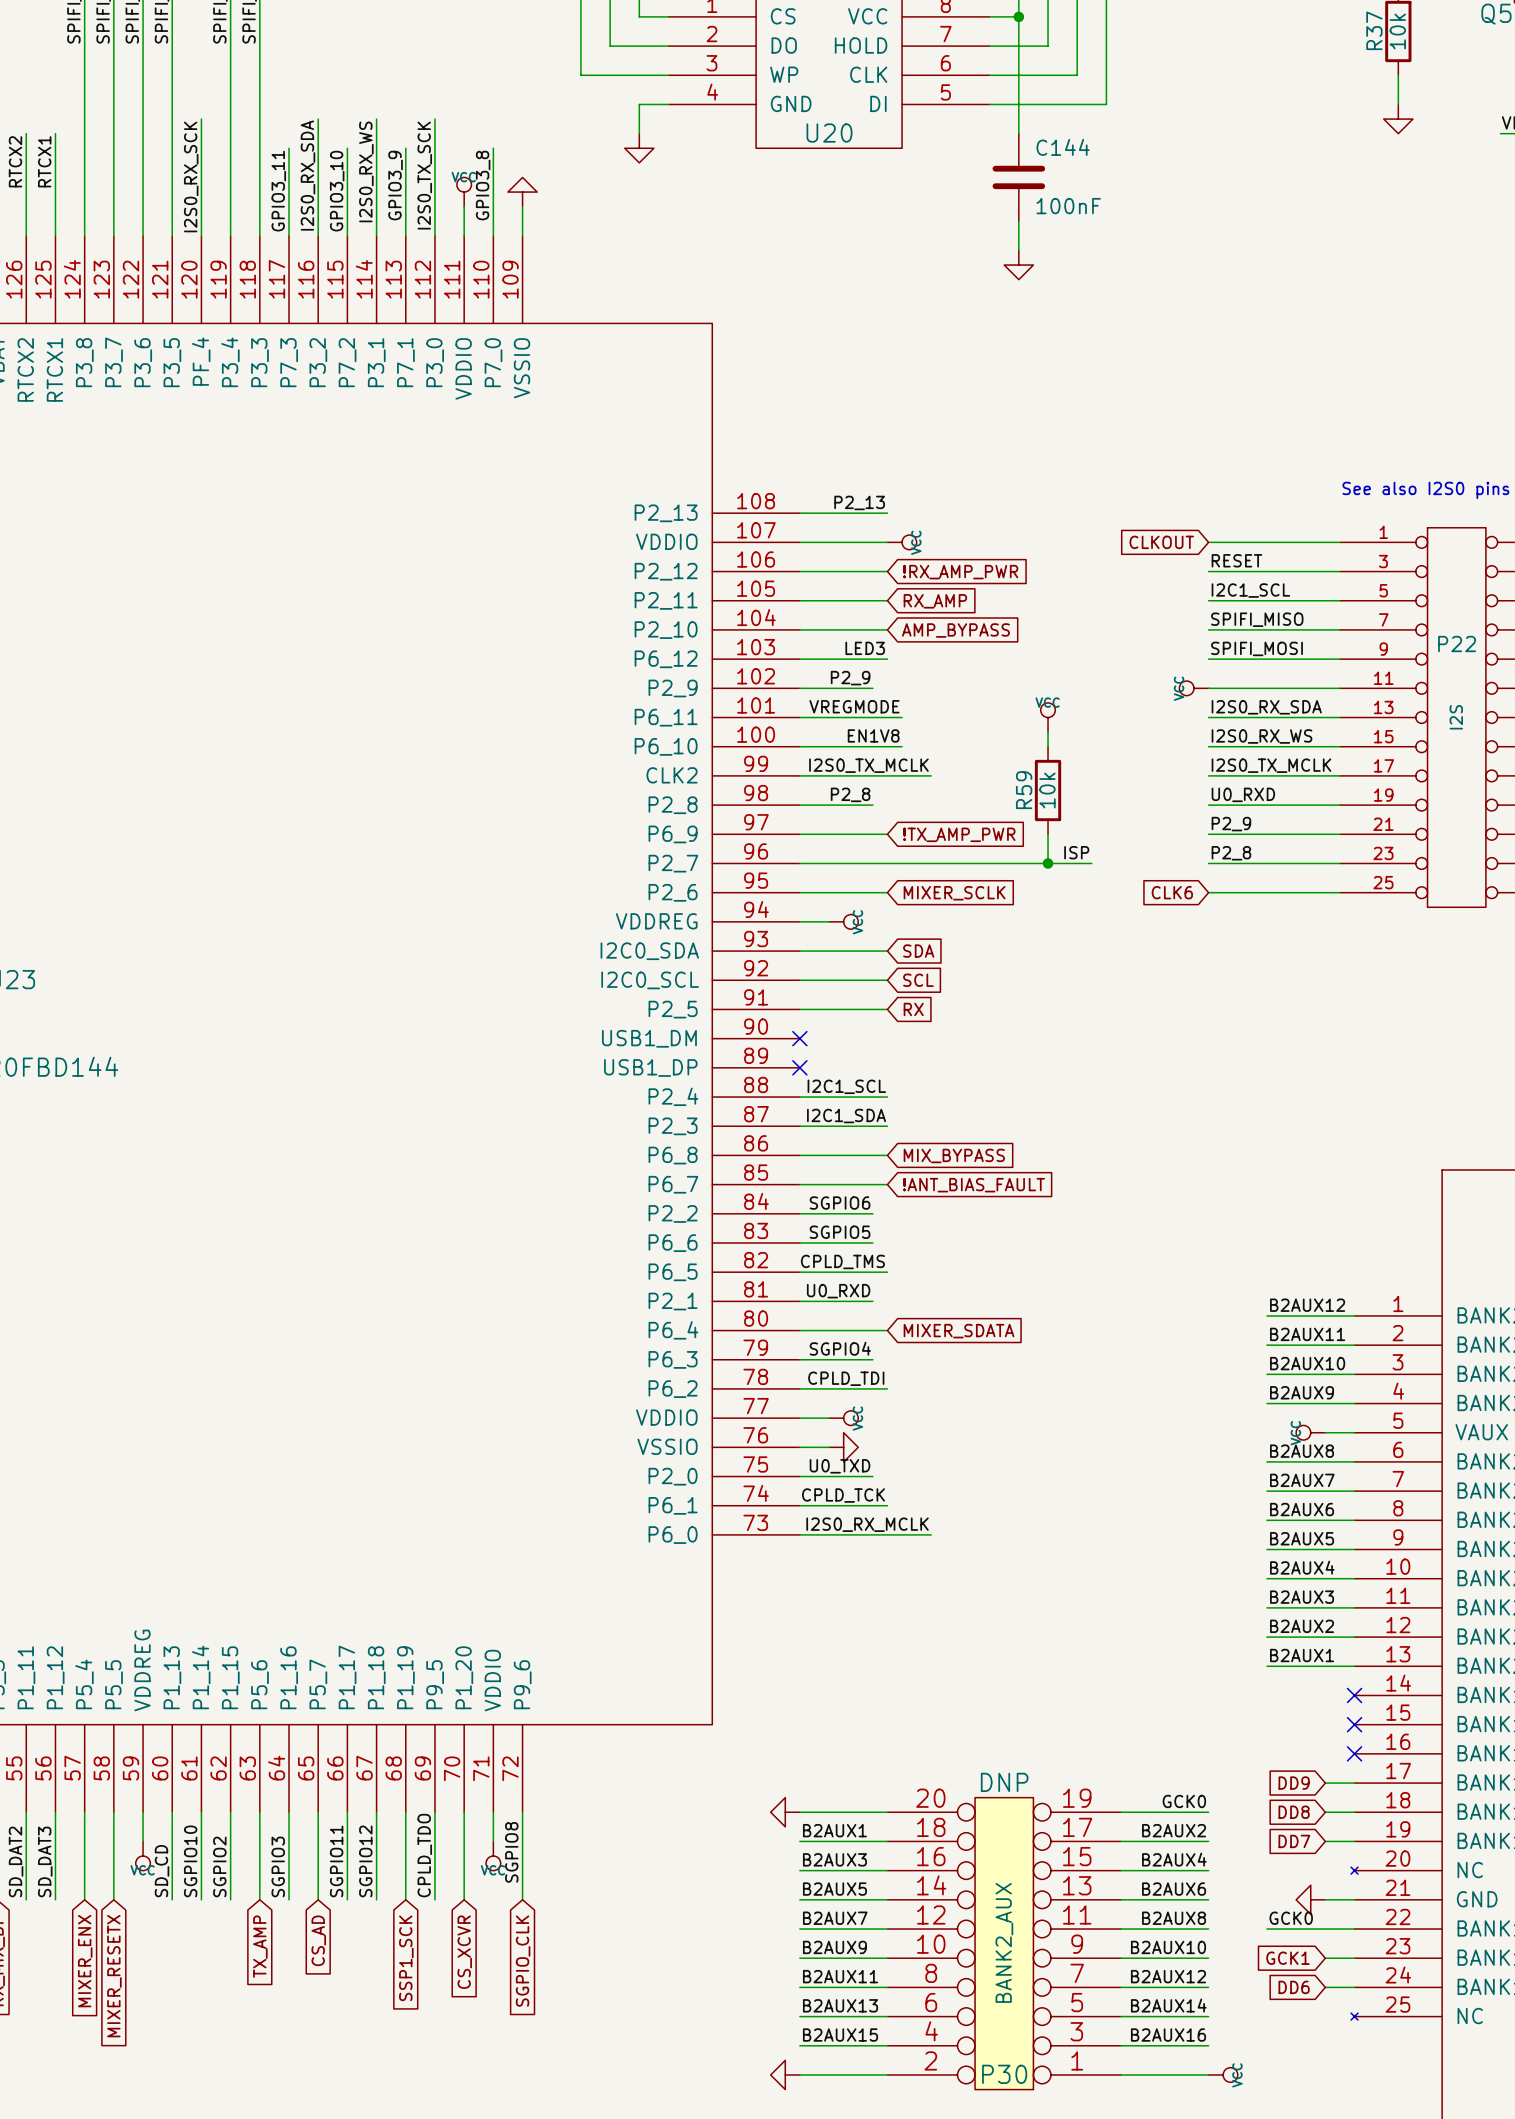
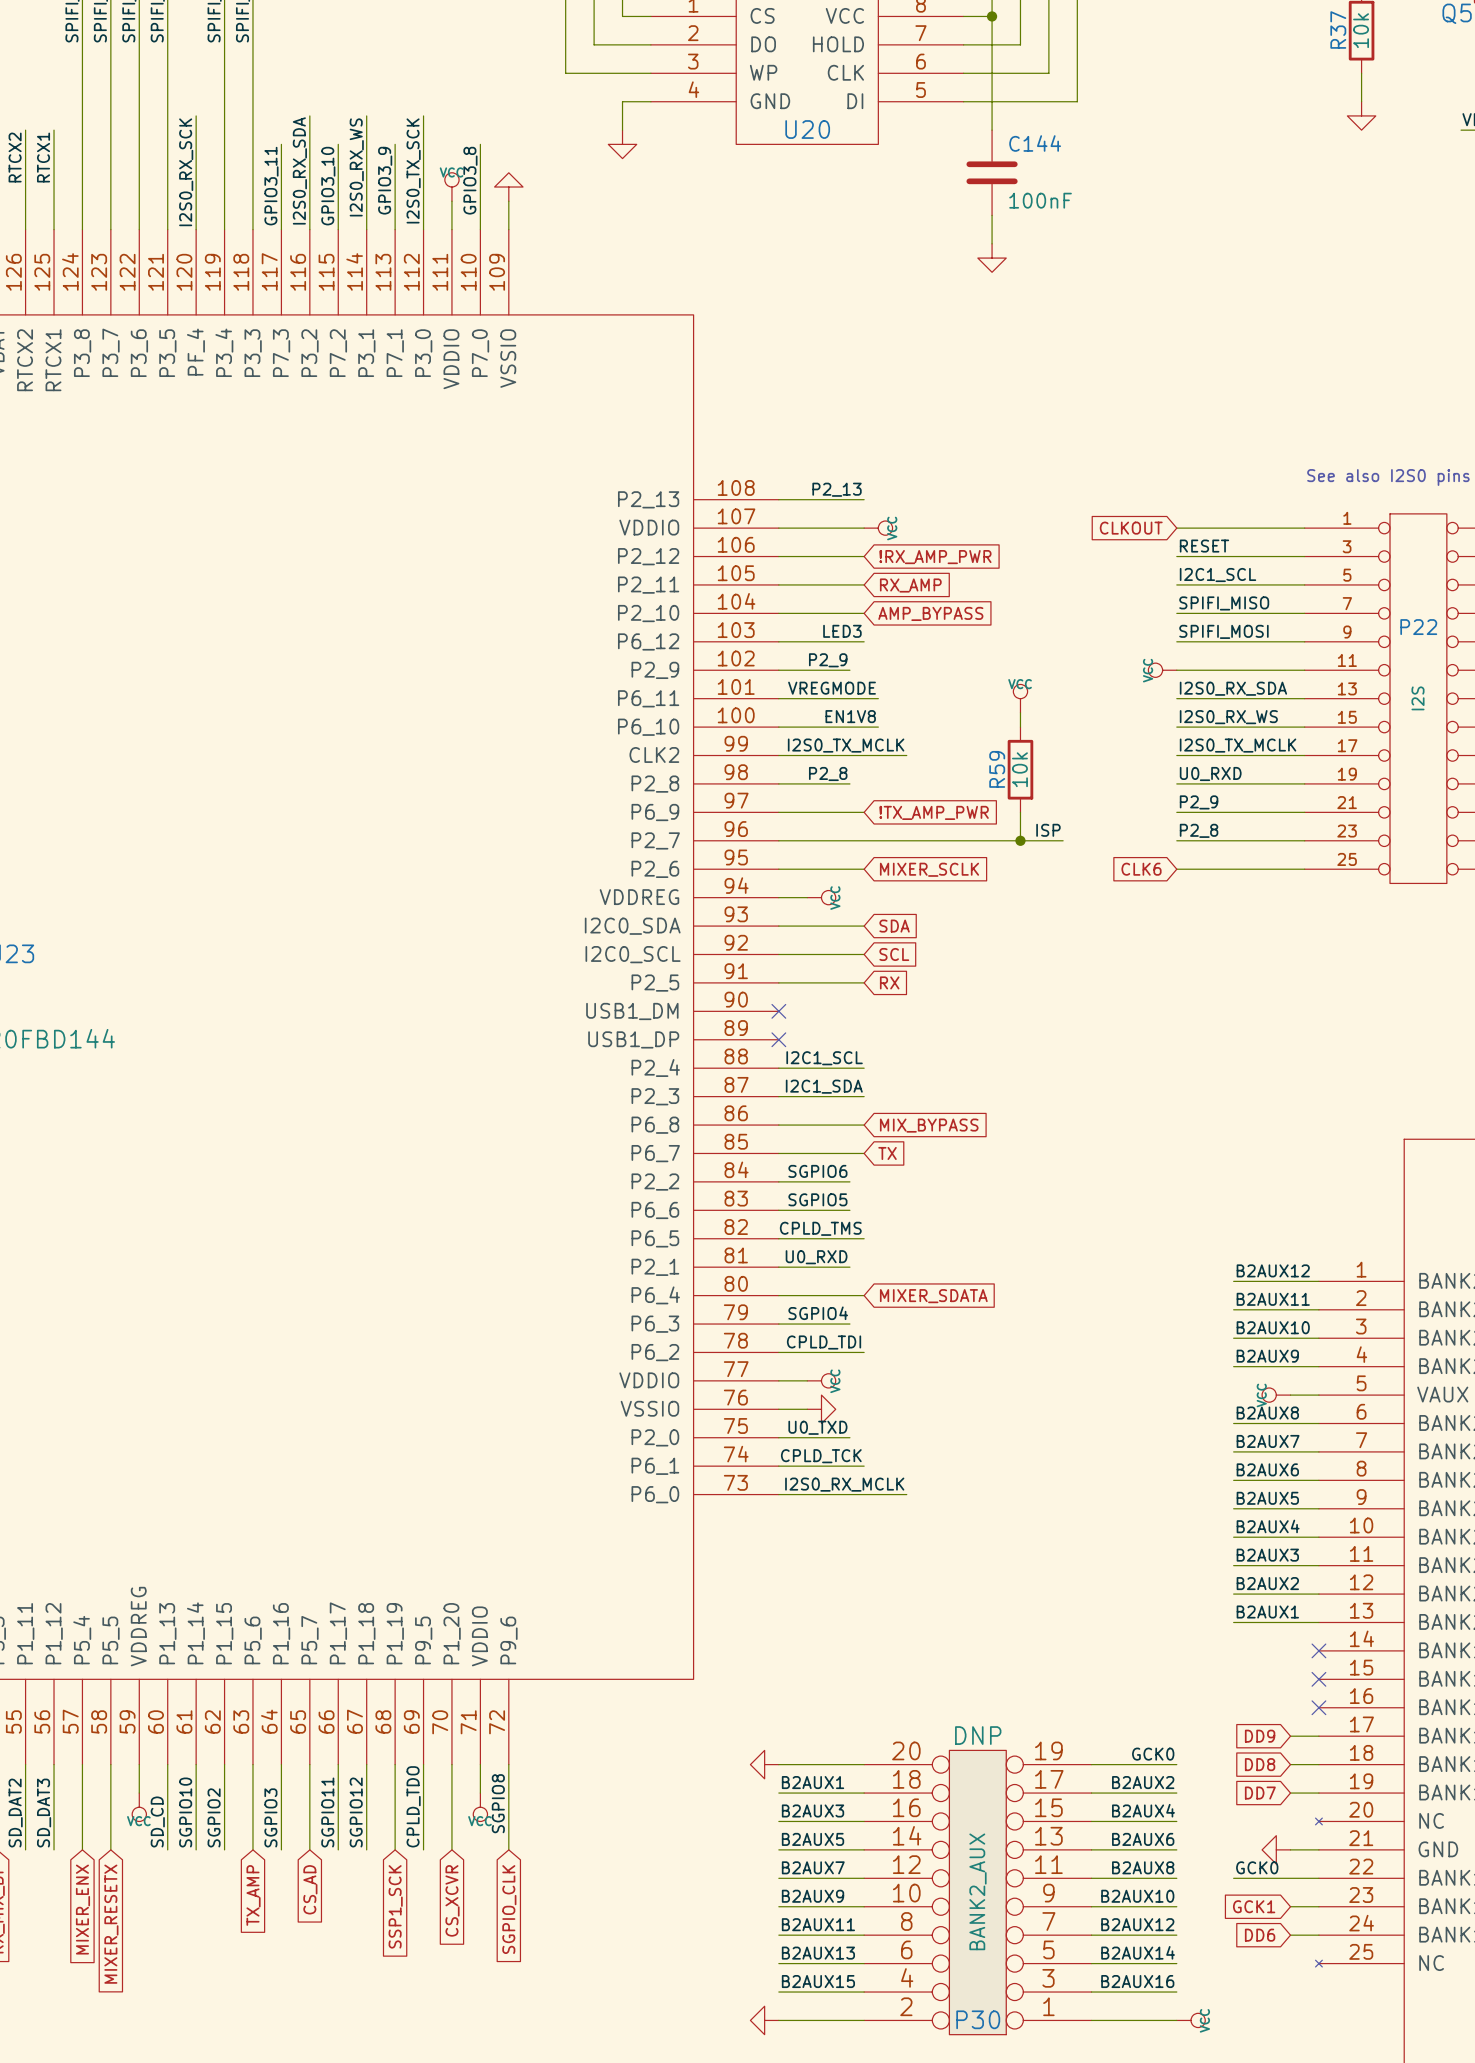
global label: !ANT_BIAS_FAULT (974, 1185) -> TX (887, 1153)

